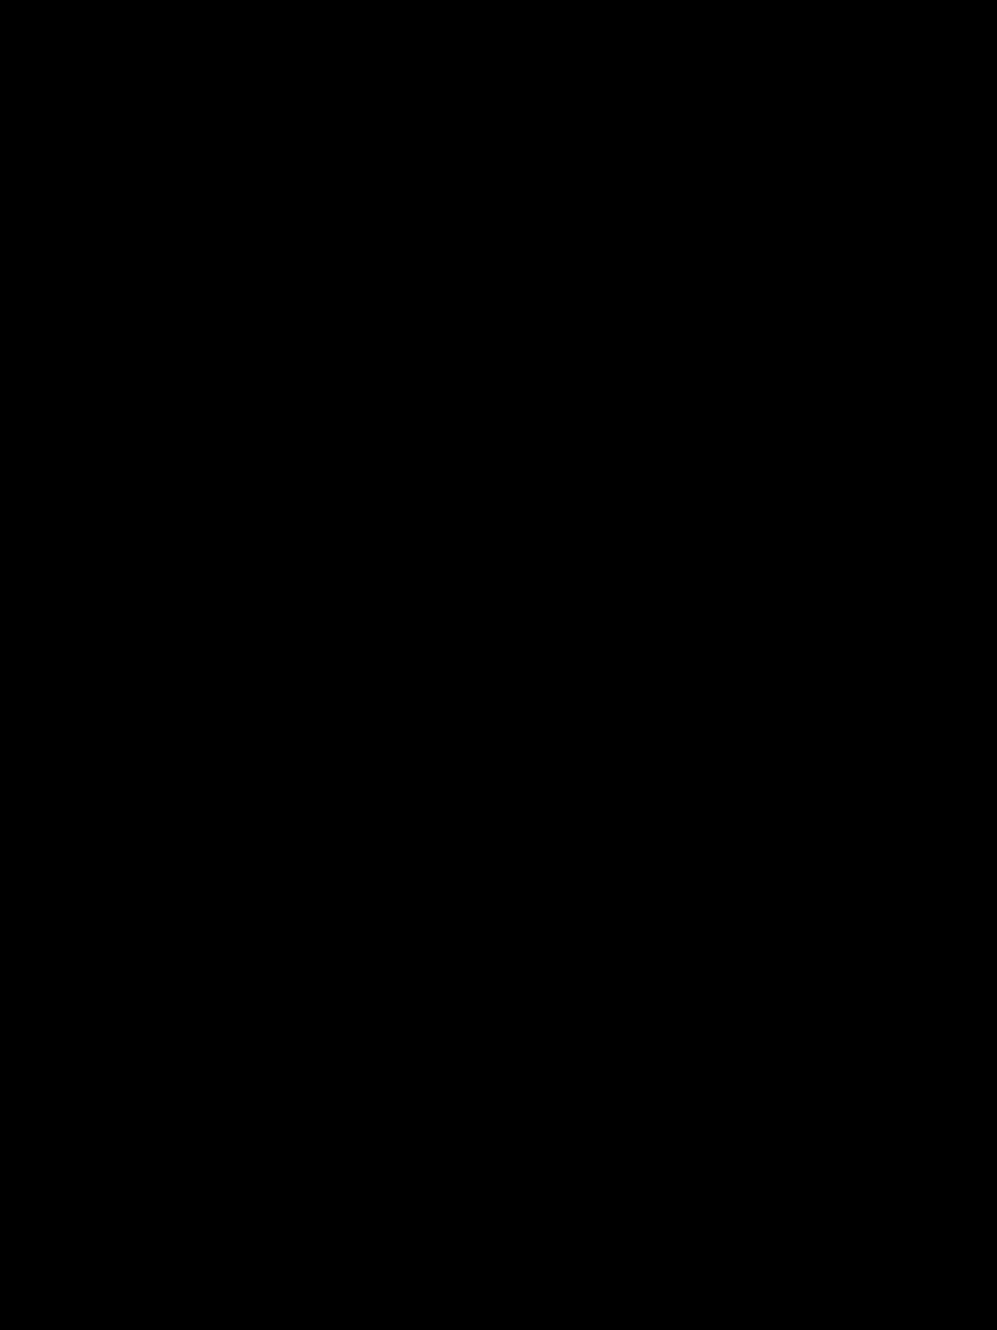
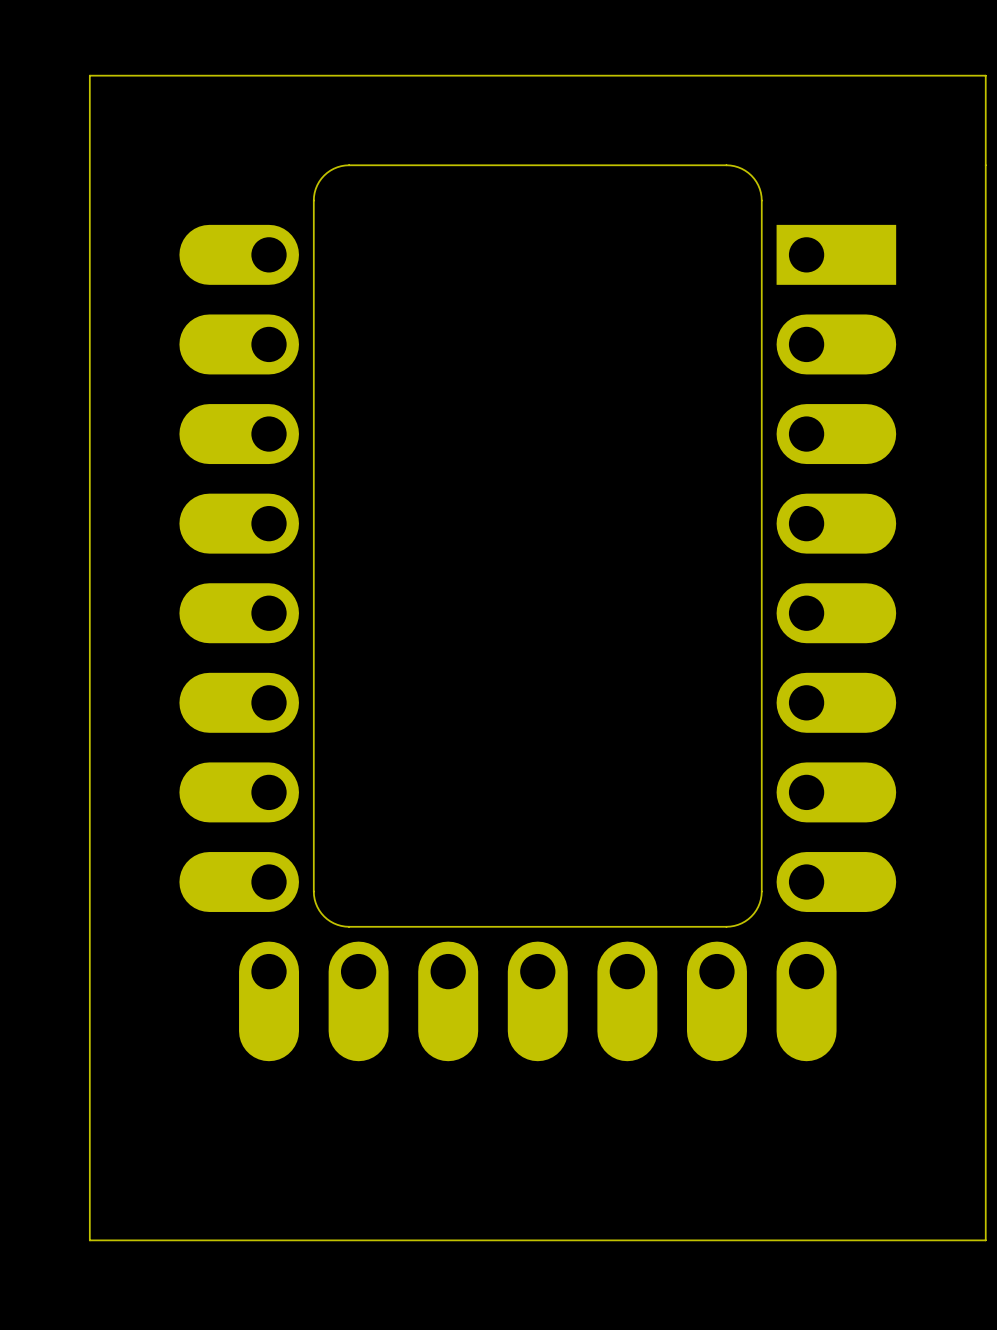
board edge: none -> (985, 75) (985, 1240) (89, 1240) (89, 75) (985, 75)
part: none -> (537, 612)

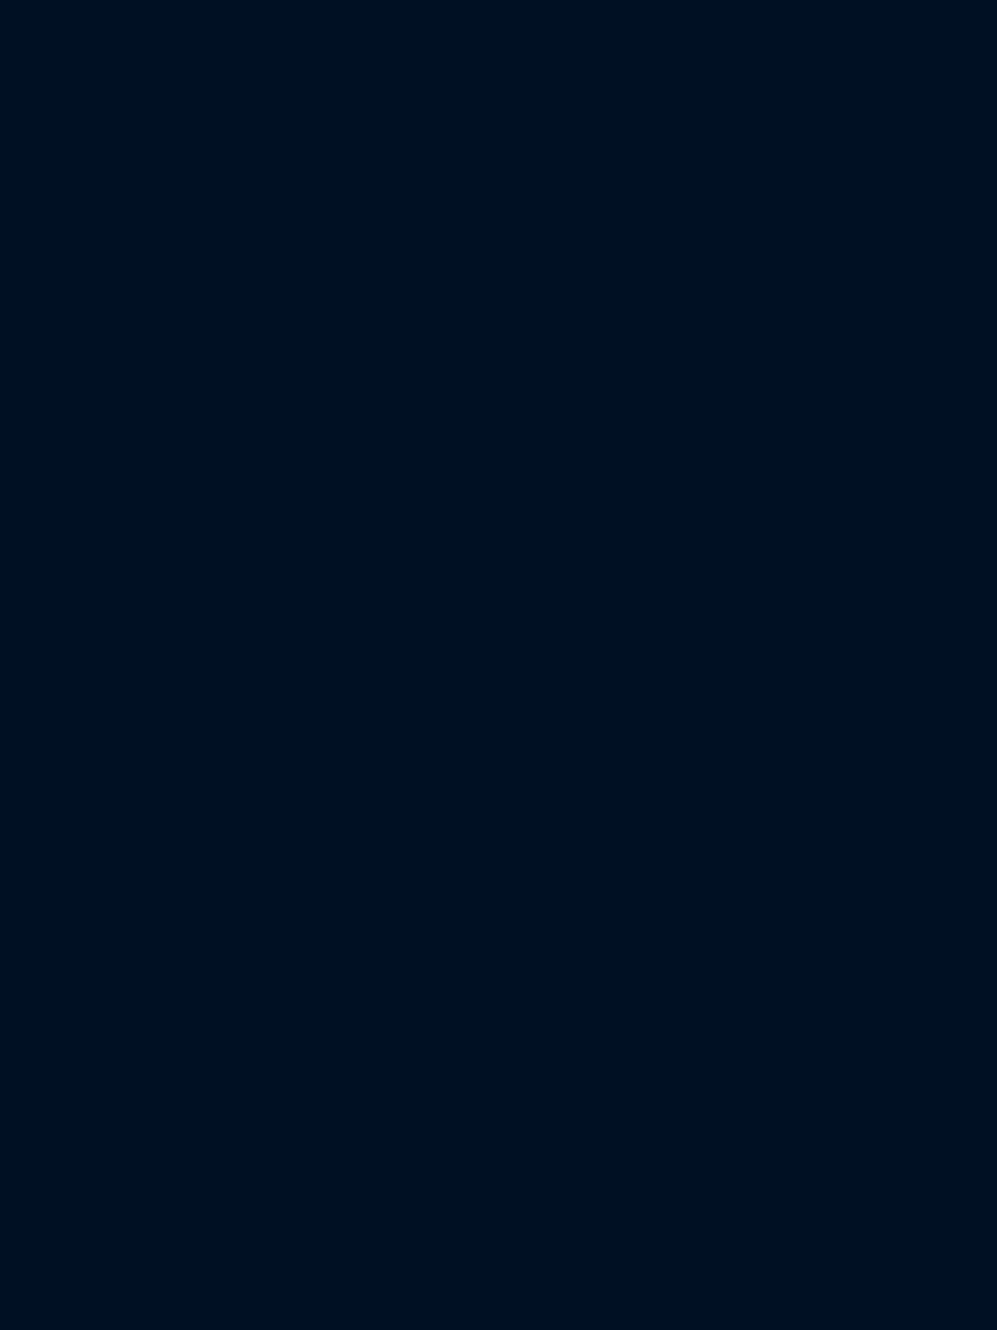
board edge: (985, 75) (985, 1240) (89, 1240) (89, 75) (985, 75) -> none
part: (537, 612) -> none

